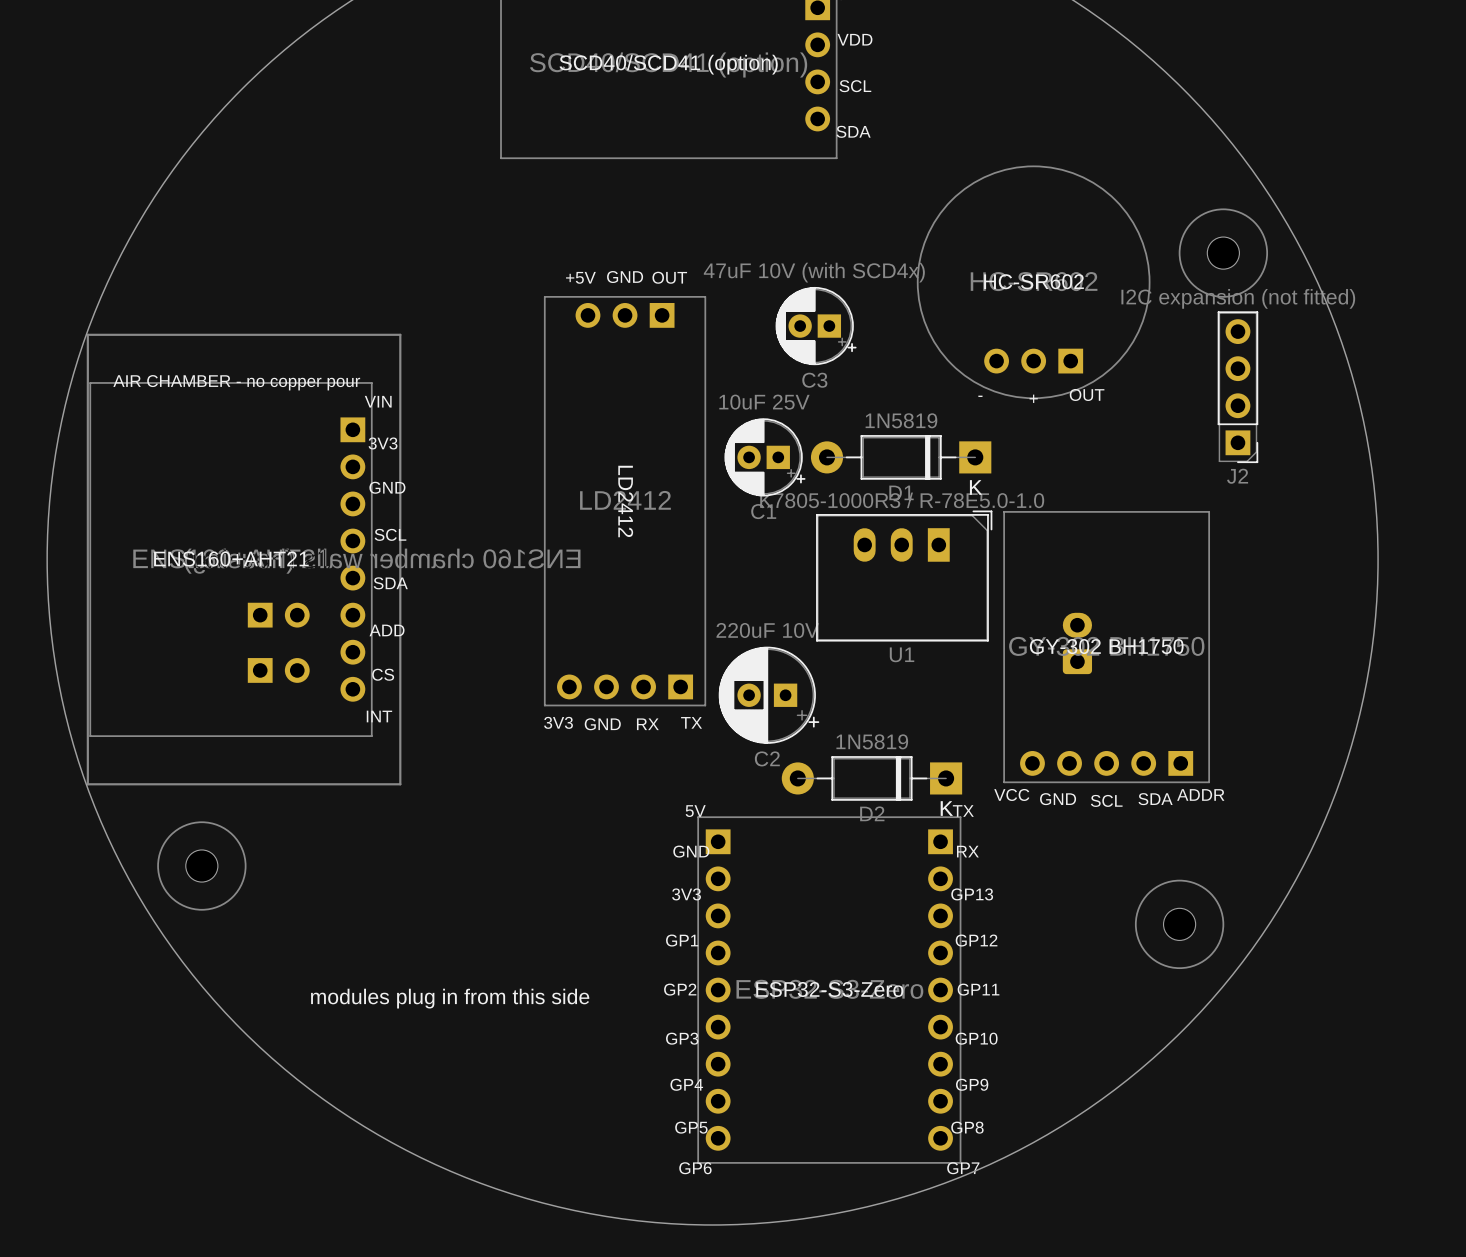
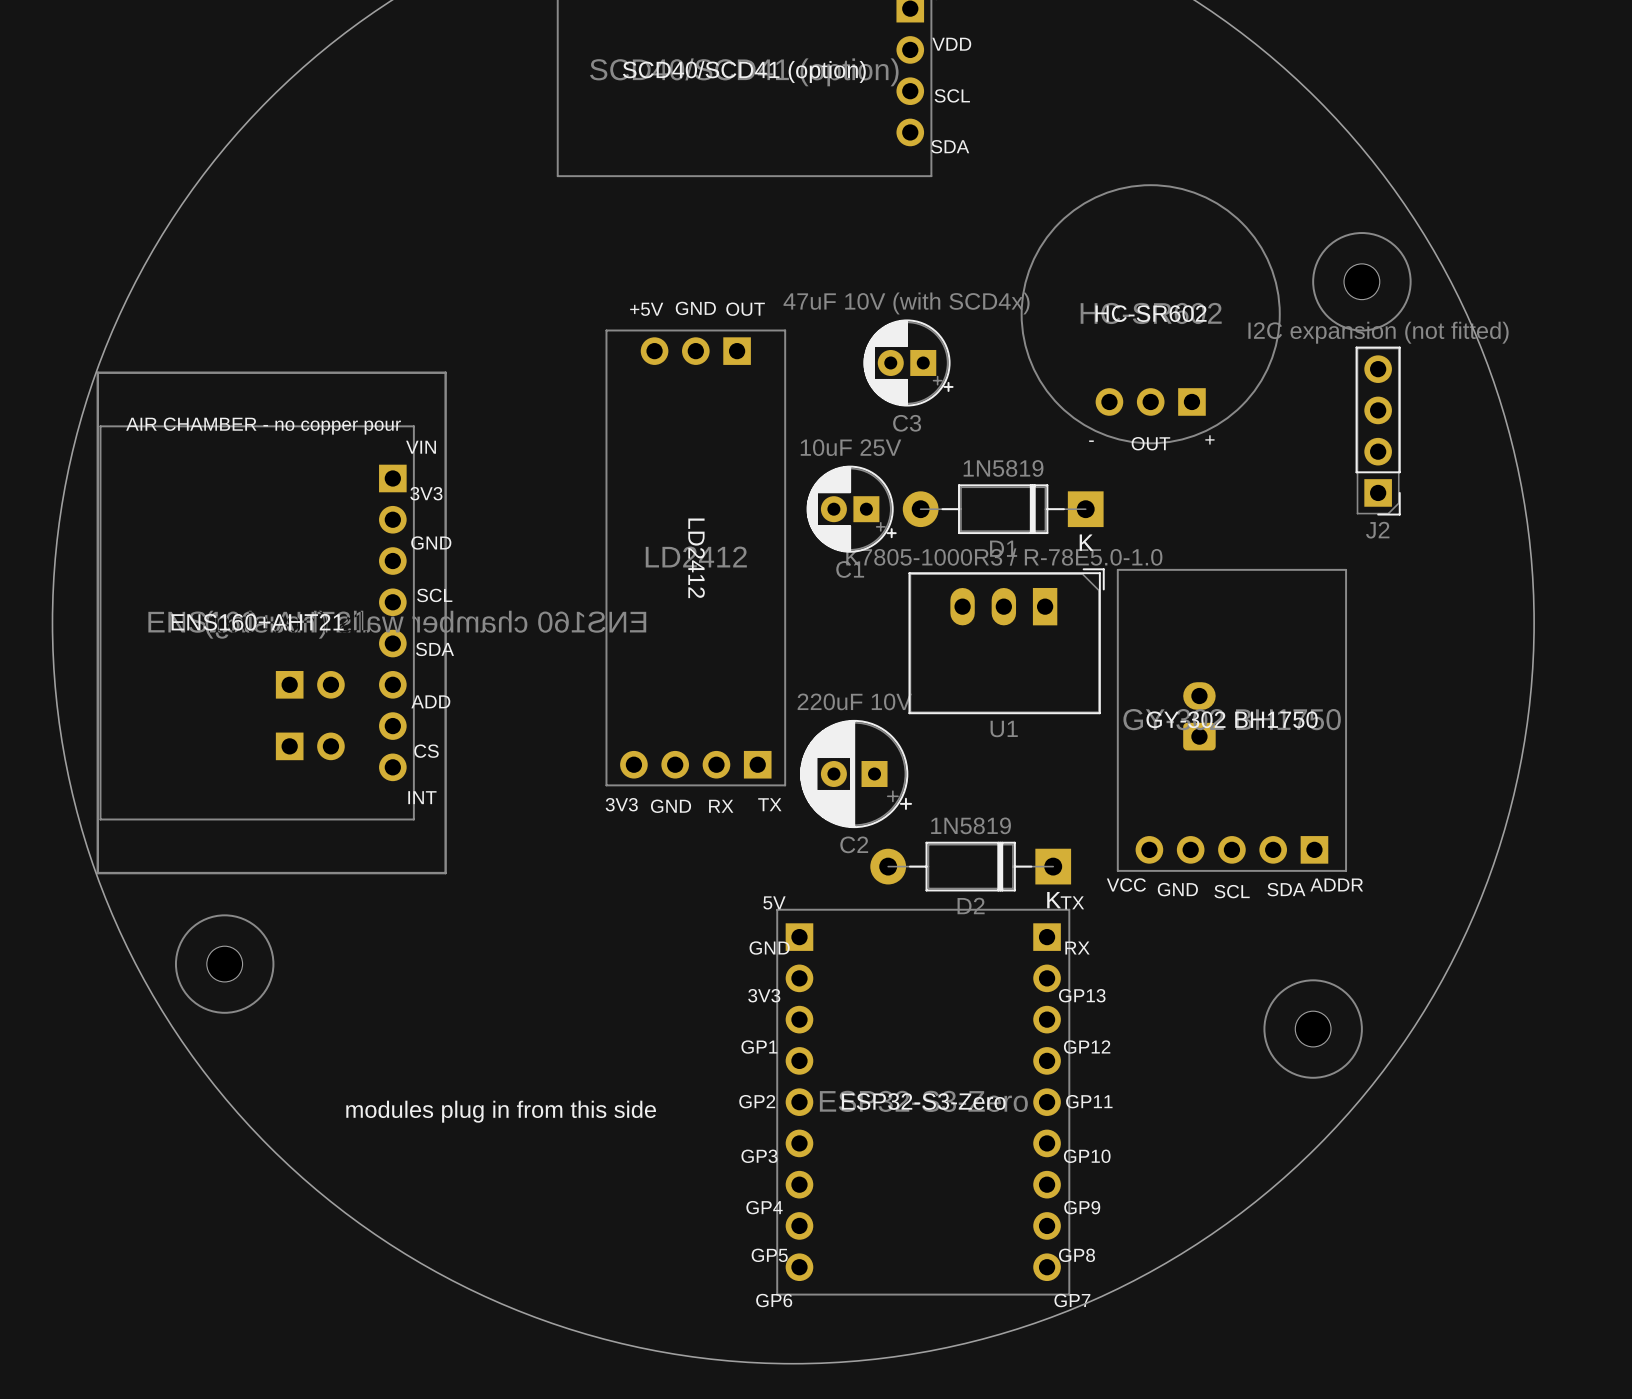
part text: OUT (1087, 394) -> + (1209, 439)
part text: + (1033, 398) -> OUT (1150, 443)

